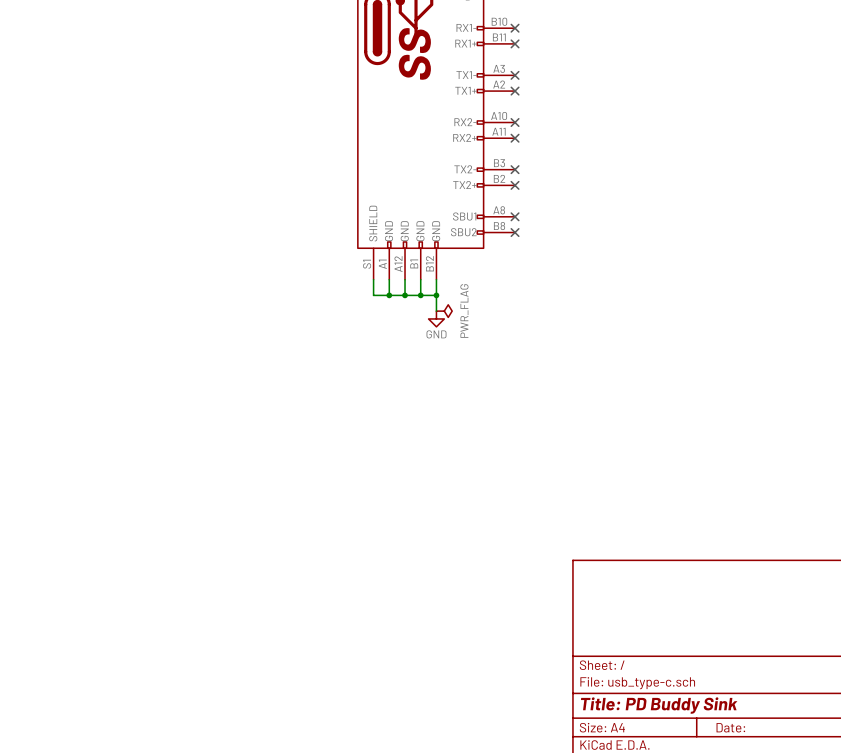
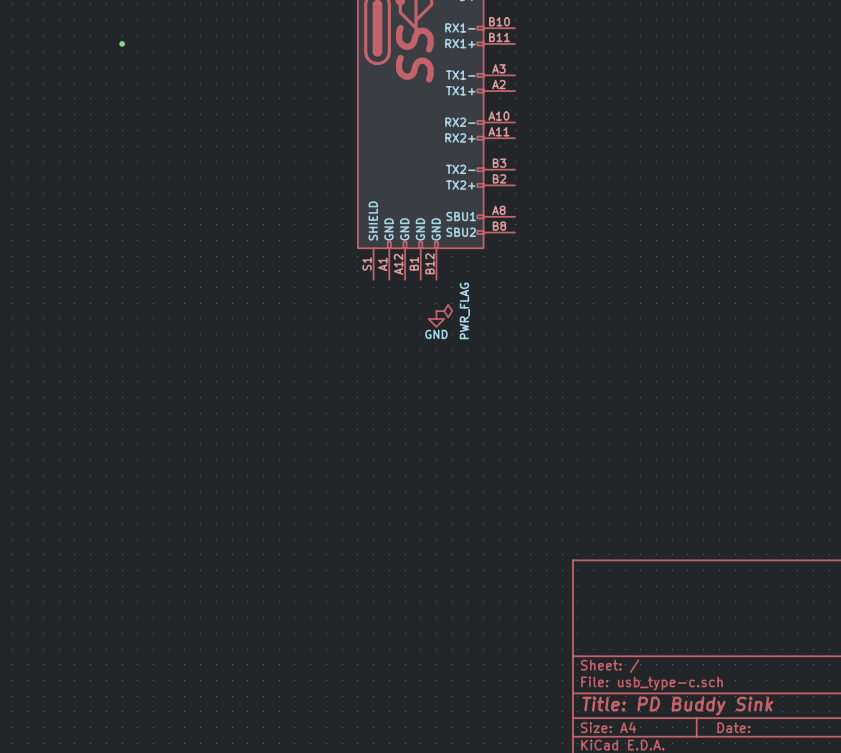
no-connect mark: (515, 28) -> none
junction: none -> (122, 43)
no-connect mark: (515, 43) -> none
no-connect mark: (515, 75) -> none
no-connect mark: (515, 91) -> none
no-connect mark: (515, 122) -> none
no-connect mark: (515, 138) -> none
no-connect mark: (515, 169) -> none
no-connect mark: (515, 185) -> none
no-connect mark: (515, 216) -> none
no-connect mark: (515, 232) -> none
wire: (373, 279) (373, 295) (436, 295) -> none
wire: (389, 279) (389, 295) -> none
wire: (405, 279) (405, 295) -> none
wire: (420, 279) (420, 295) -> none
wire: (436, 279) (436, 311) -> none
junction: (389, 295) -> none
junction: (405, 295) -> none
junction: (420, 295) -> none
junction: (436, 295) -> none

